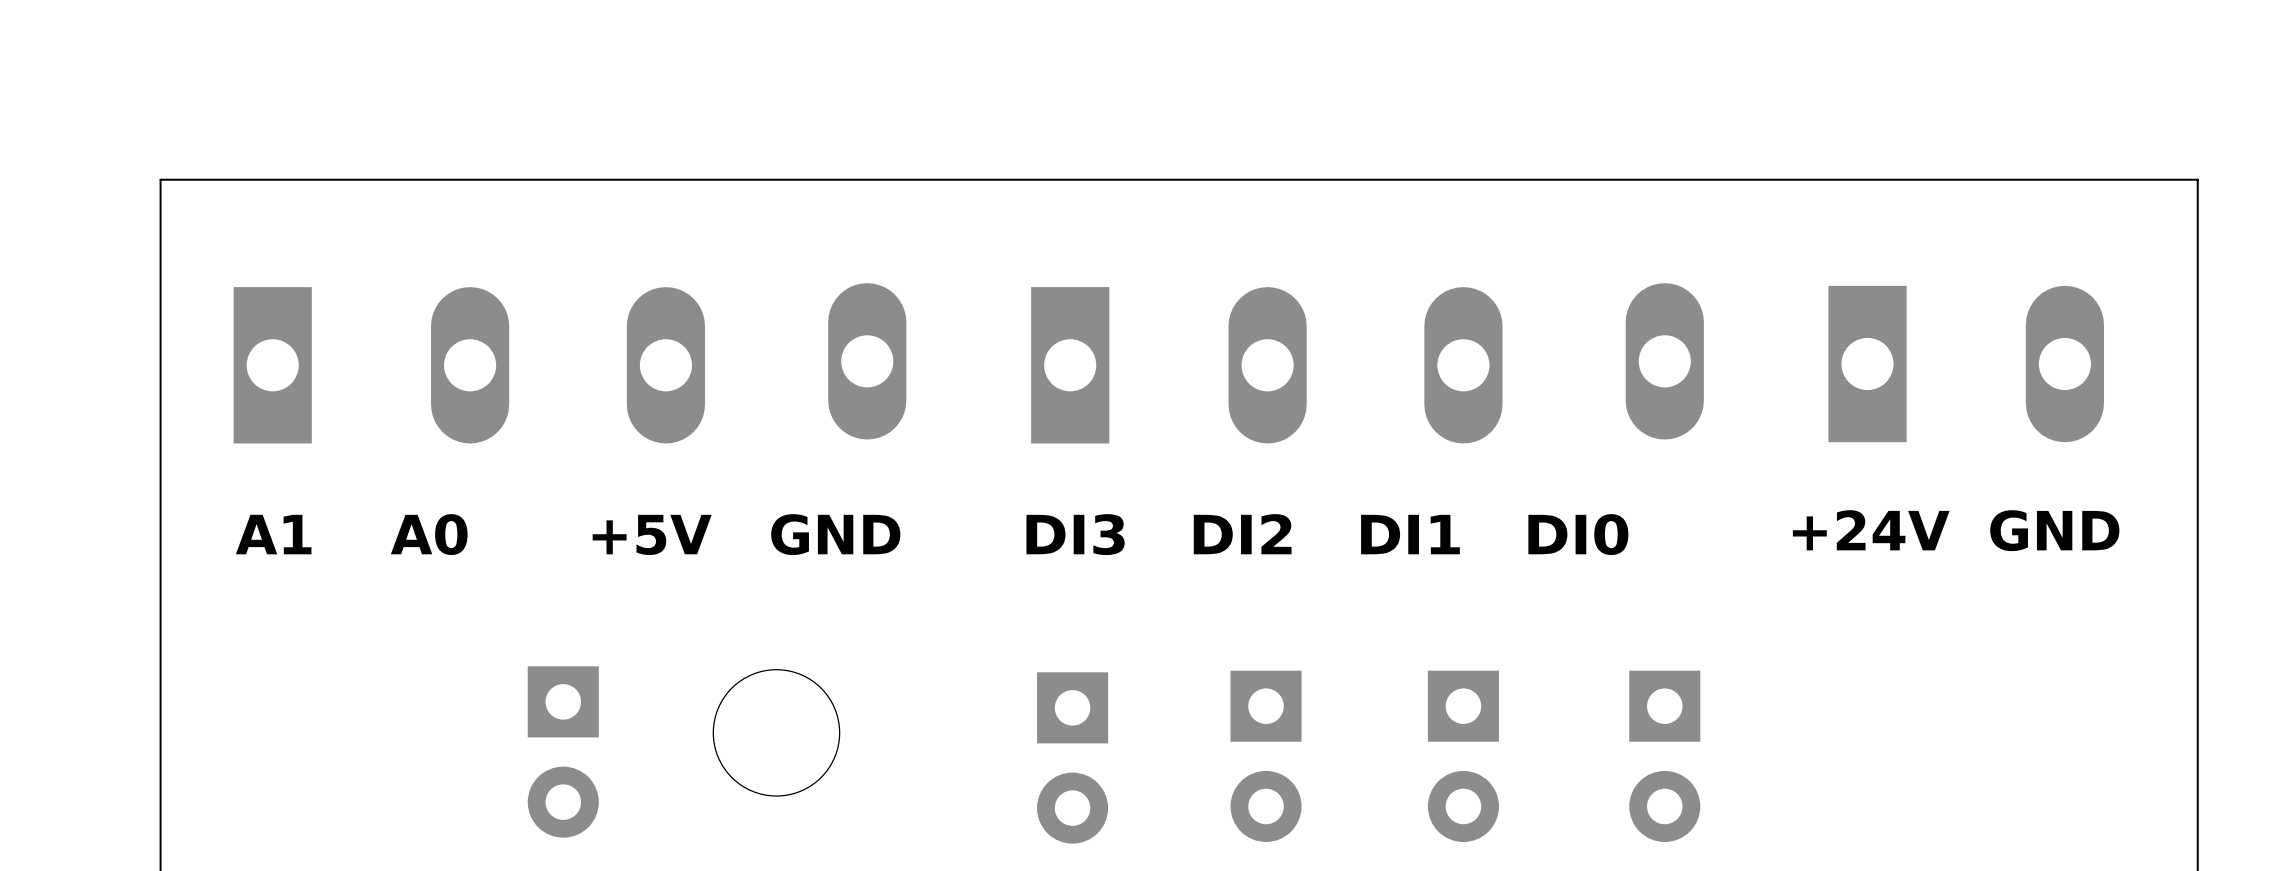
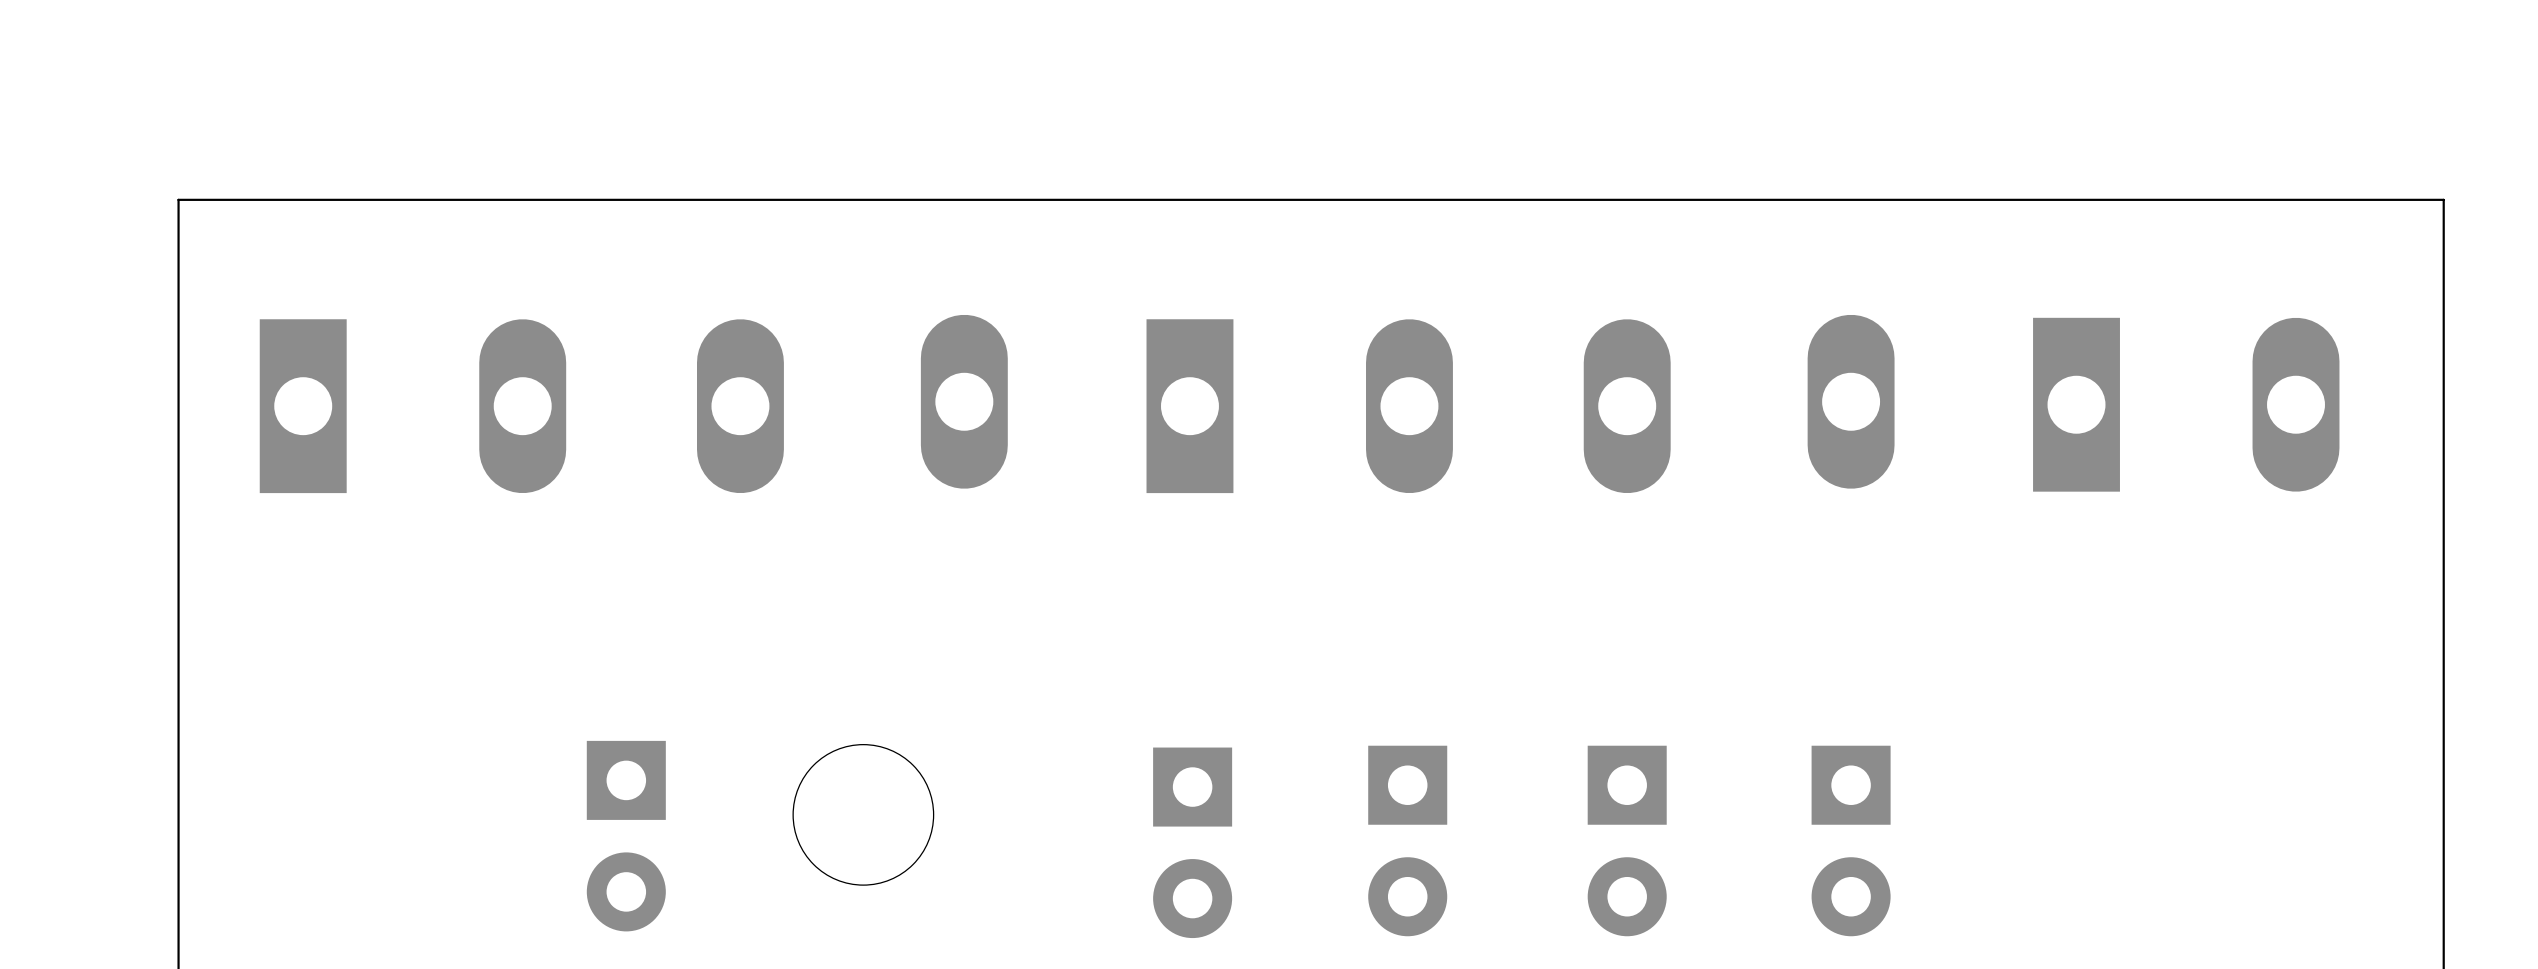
text: +24V GND (1956, 530) -> none
text: A1 A0 (351, 534) -> none
text: +5V GND (746, 534) -> none
text: DI3 DI2 DI1 DI0 (1327, 534) -> none

